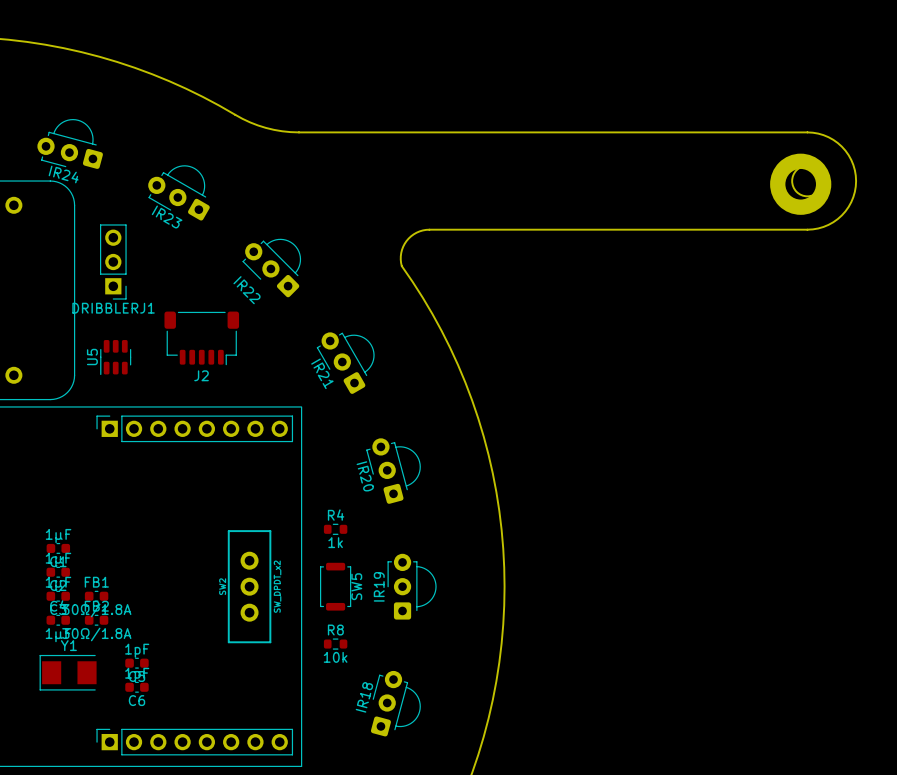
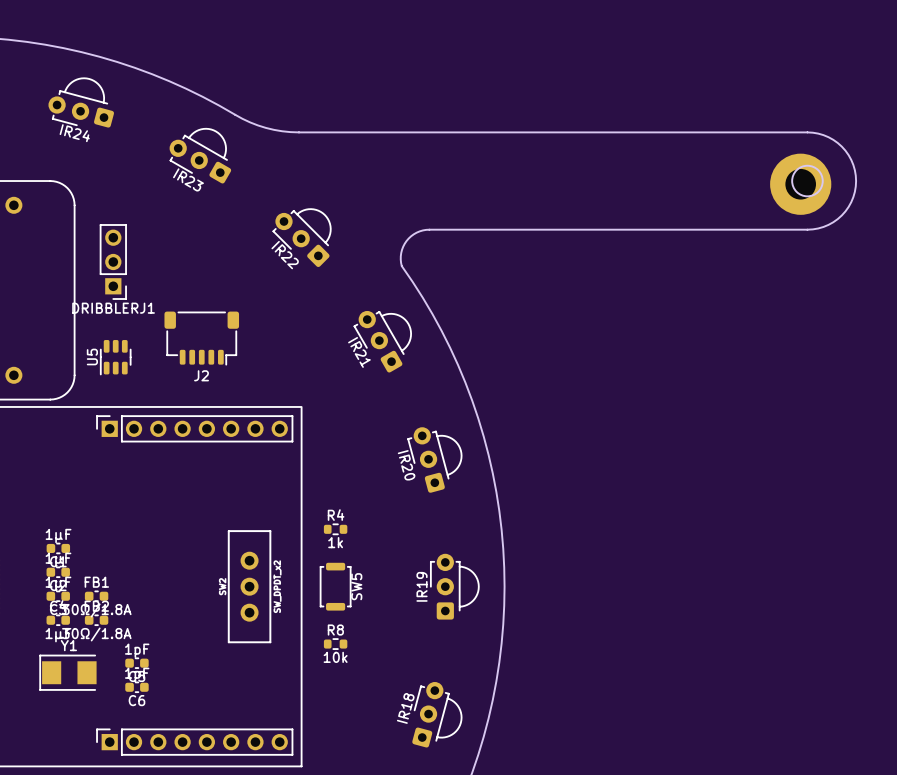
IR24 position: (70, 143) -> (81, 102)
IR23 position: (178, 192) -> (200, 155)
IR22 position: (271, 268) -> (302, 237)
IR22 name position: IR22 (247, 290) -> IR22 (285, 255)
IR21 position: (345, 363) -> (382, 341)
IR20 position: (393, 471) -> (434, 460)
IR19 position: (412, 586) -> (454, 586)
IR18 position: (395, 703) -> (437, 714)

